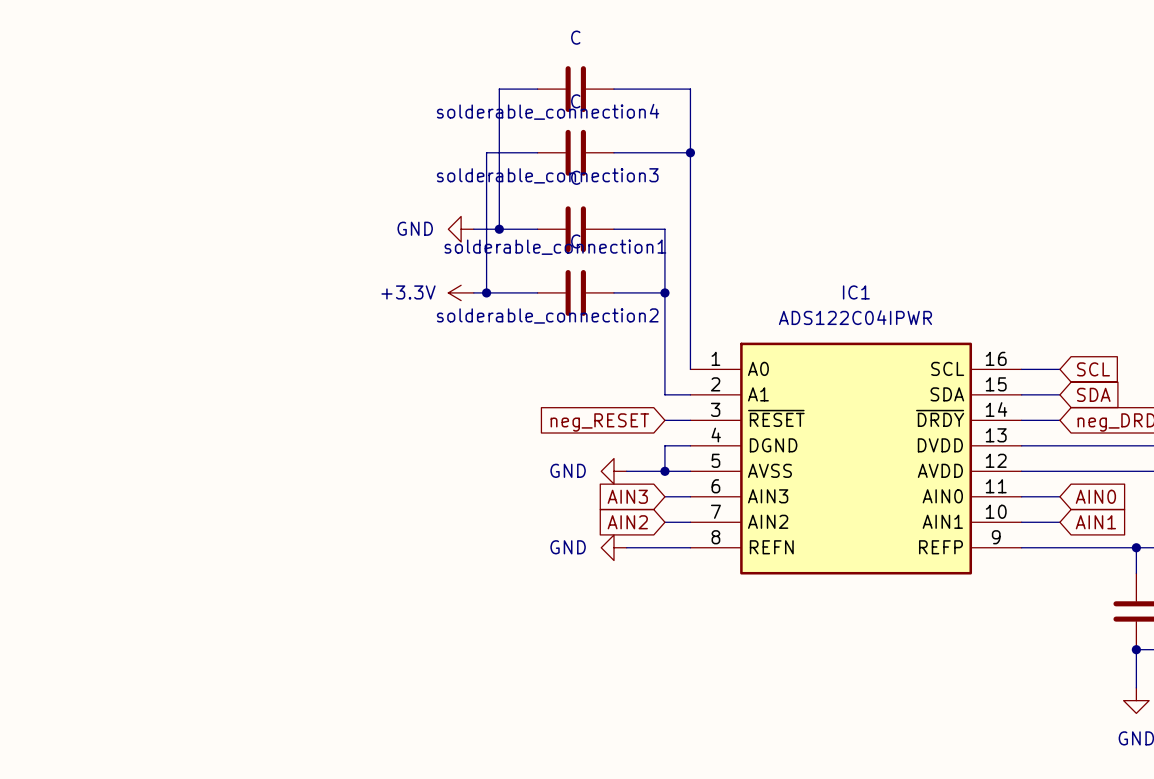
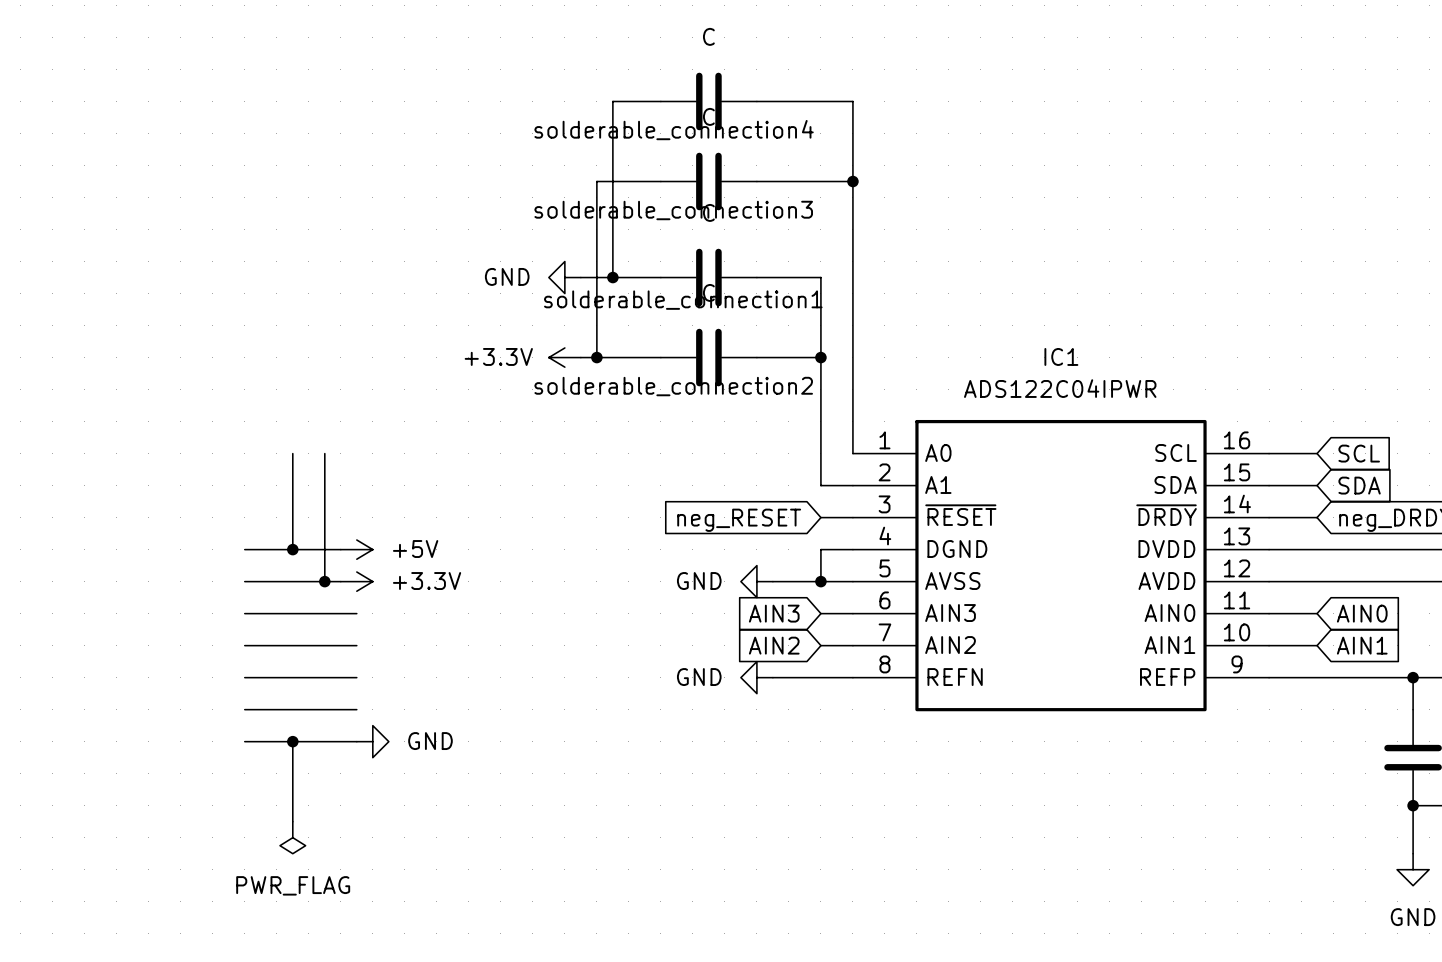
wire: none -> (292, 453) (292, 549)
wire: none -> (324, 453) (324, 581)
wire: none -> (244, 549) (340, 549)
junction: none -> (292, 549)
power symbol: none -> +5V (356, 549)
wire: none -> (244, 581) (340, 581)
junction: none -> (324, 581)
power symbol: none -> +3.3V (356, 581)
wire: none -> (244, 613) (356, 613)
wire: none -> (244, 645) (356, 645)
wire: none -> (244, 677) (356, 677)
wire: none -> (244, 709) (356, 709)
wire: none -> (244, 741) (356, 741)
wire: none -> (292, 741) (292, 821)
junction: none -> (292, 741)
power symbol: none -> GND (372, 741)
power symbol: none -> PWR_FLAG (292, 837)

